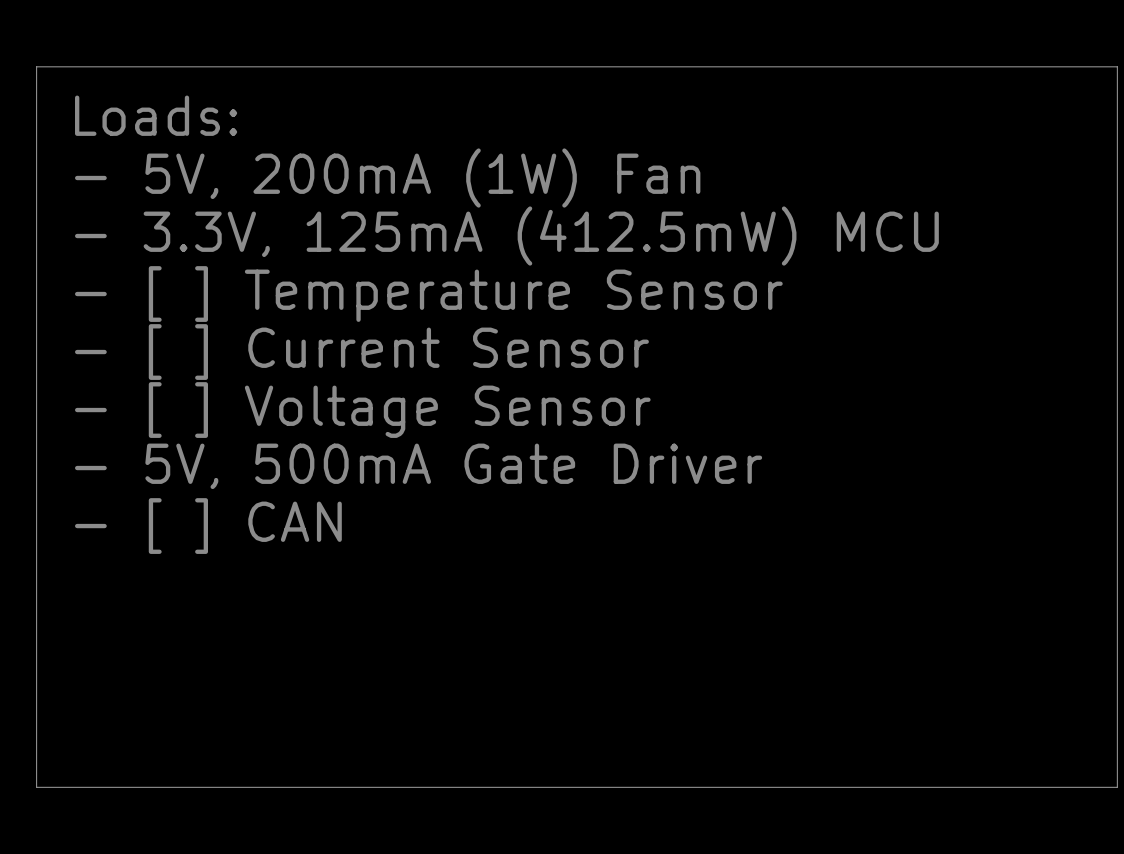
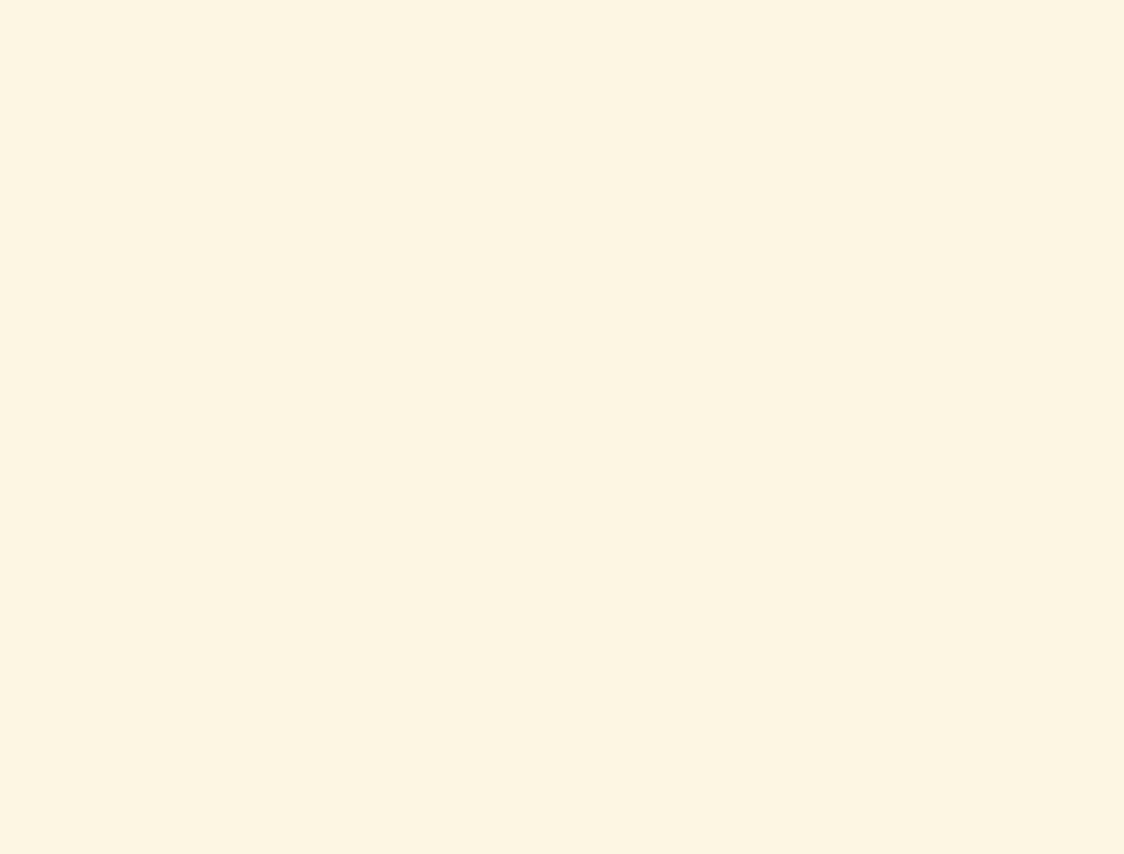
line: (36, 66) (1117, 66) (1117, 787) (36, 787) (36, 66) -> none
text: Loads: (156, 115) -> none
text: - 5V, 200mA (1W) Fan (387, 178) -> none
text: - 3.3V, 125mA (412.5mW) MCU (506, 236) -> none
text: - [ ] Temperature Sensor (428, 294) -> none
text: - [ ] Current Sensor (361, 352) -> none
text: - [ ] Voltage Sensor (362, 410) -> none
text: - 5V, 500mA Gate Driver (418, 466) -> none
text: - [ ] CAN (208, 526) -> none

